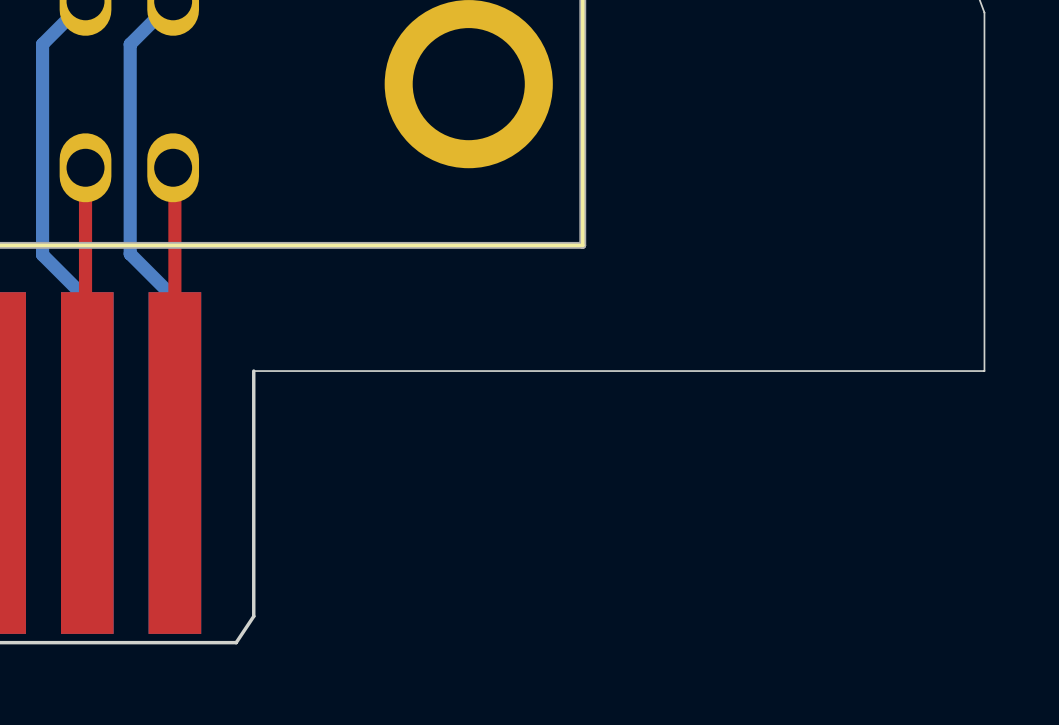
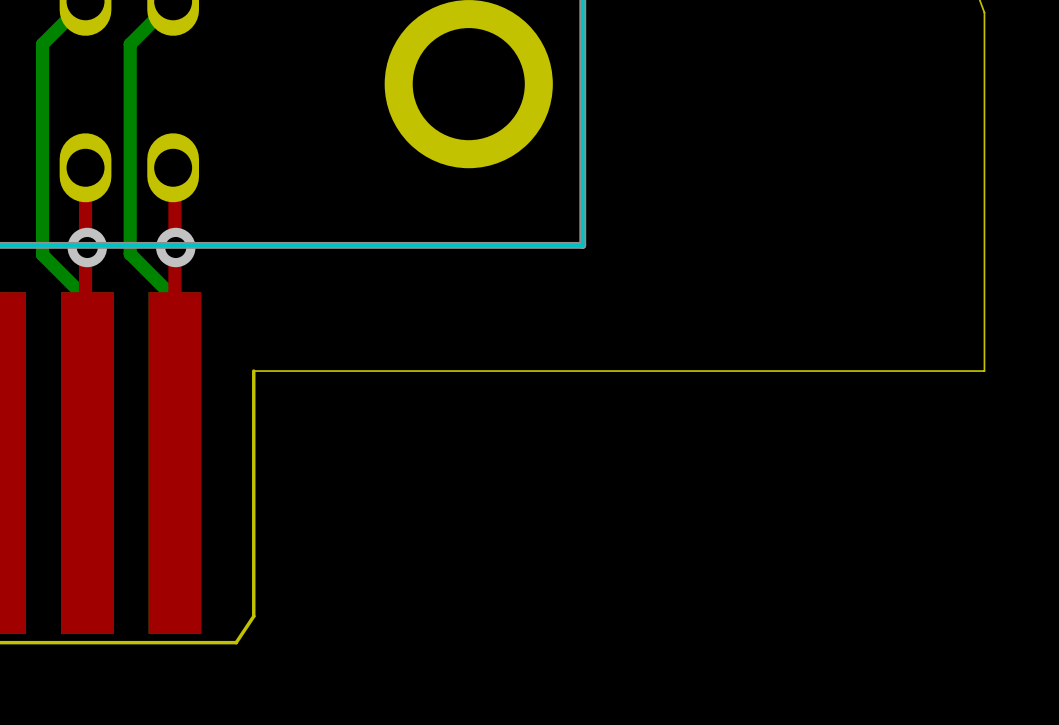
via: none -> (87, 247)
via: none -> (175, 247)

